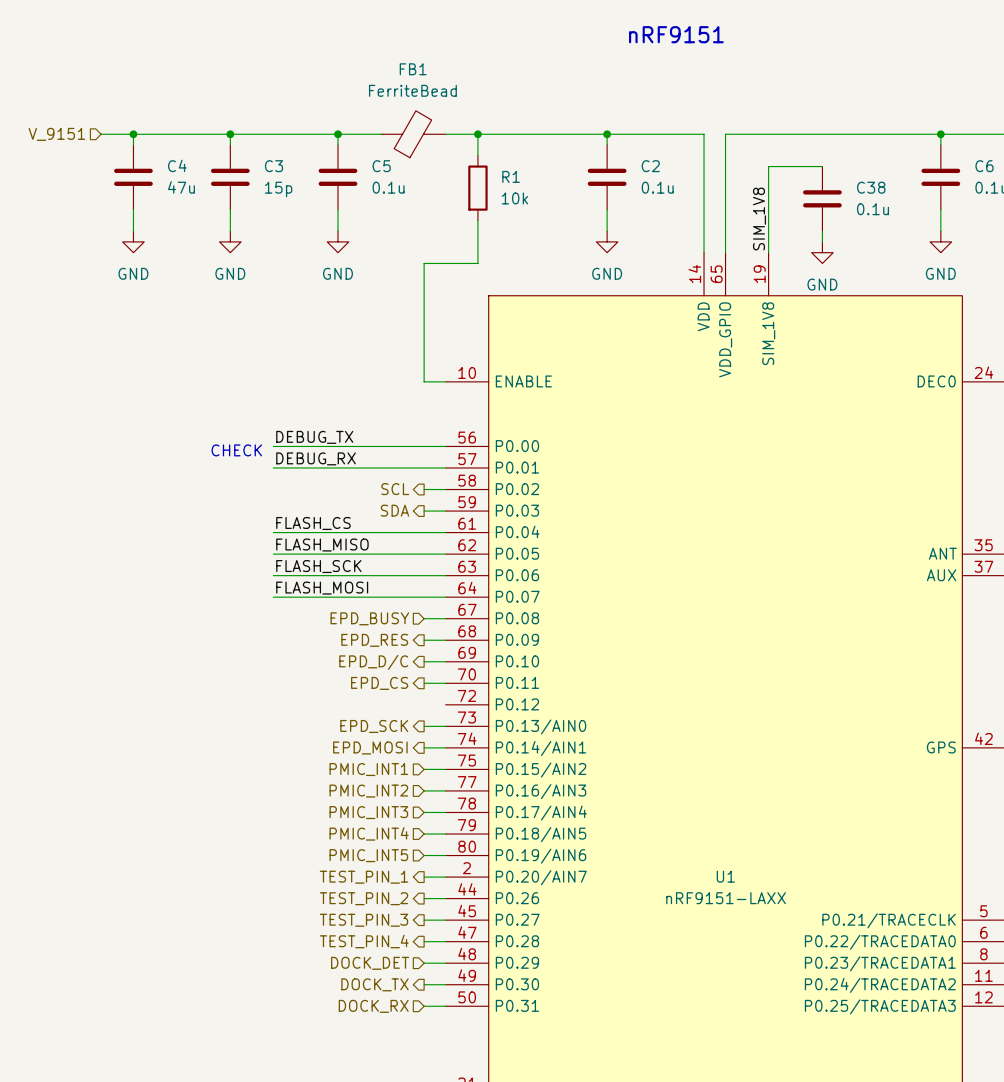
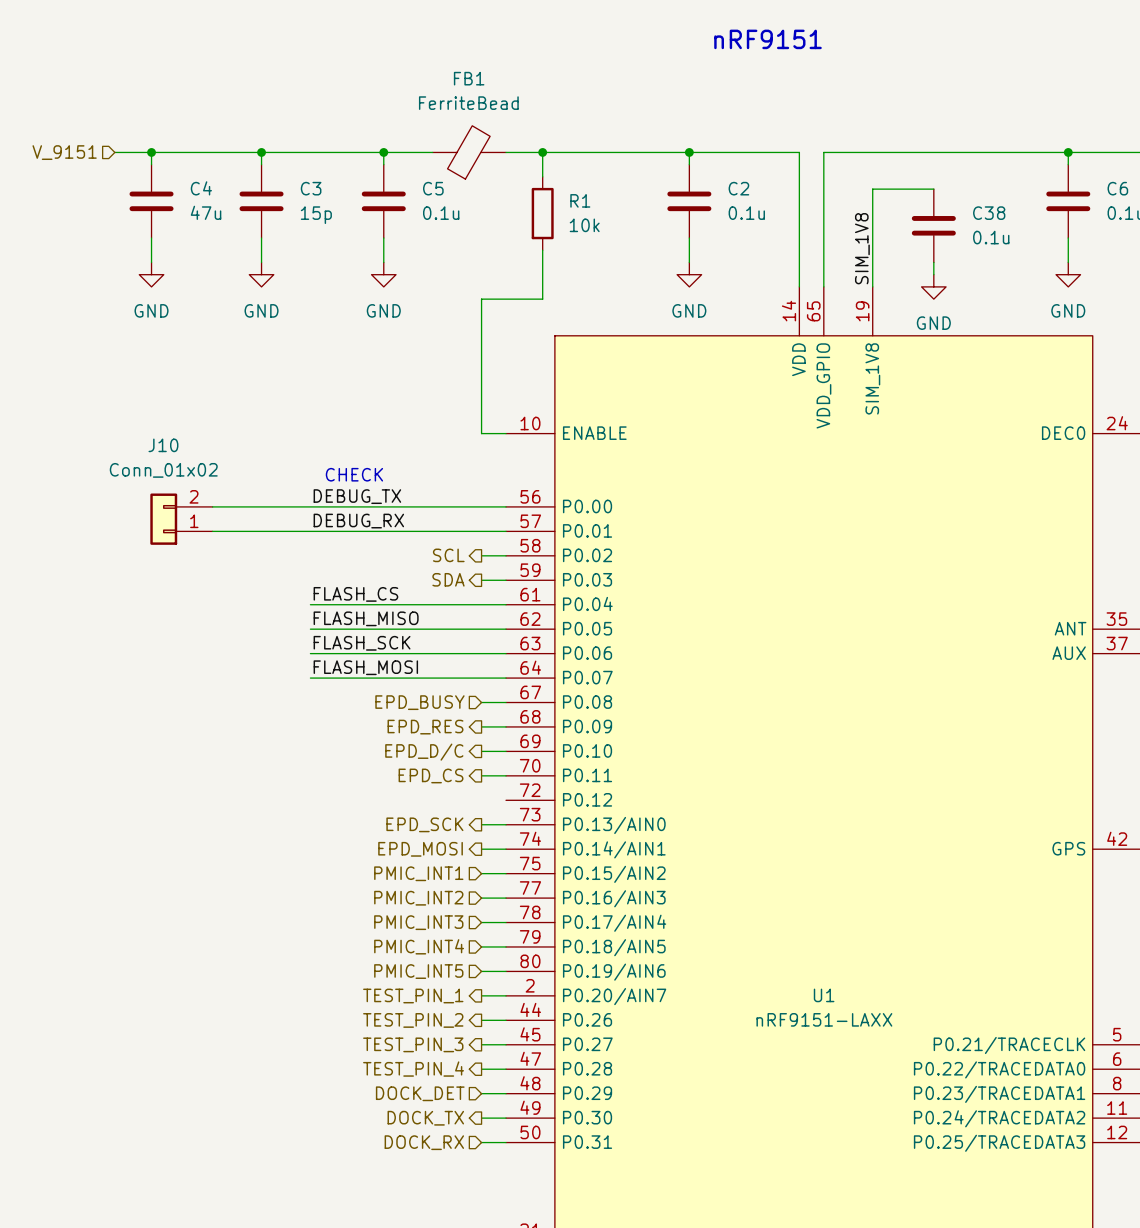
wire: none -> (212, 506) (310, 506)
text position: CHECK (236, 450) -> CHECK (354, 474)
J10: none -> Conn_01x02 (181, 519)
wire: none -> (212, 531) (310, 531)

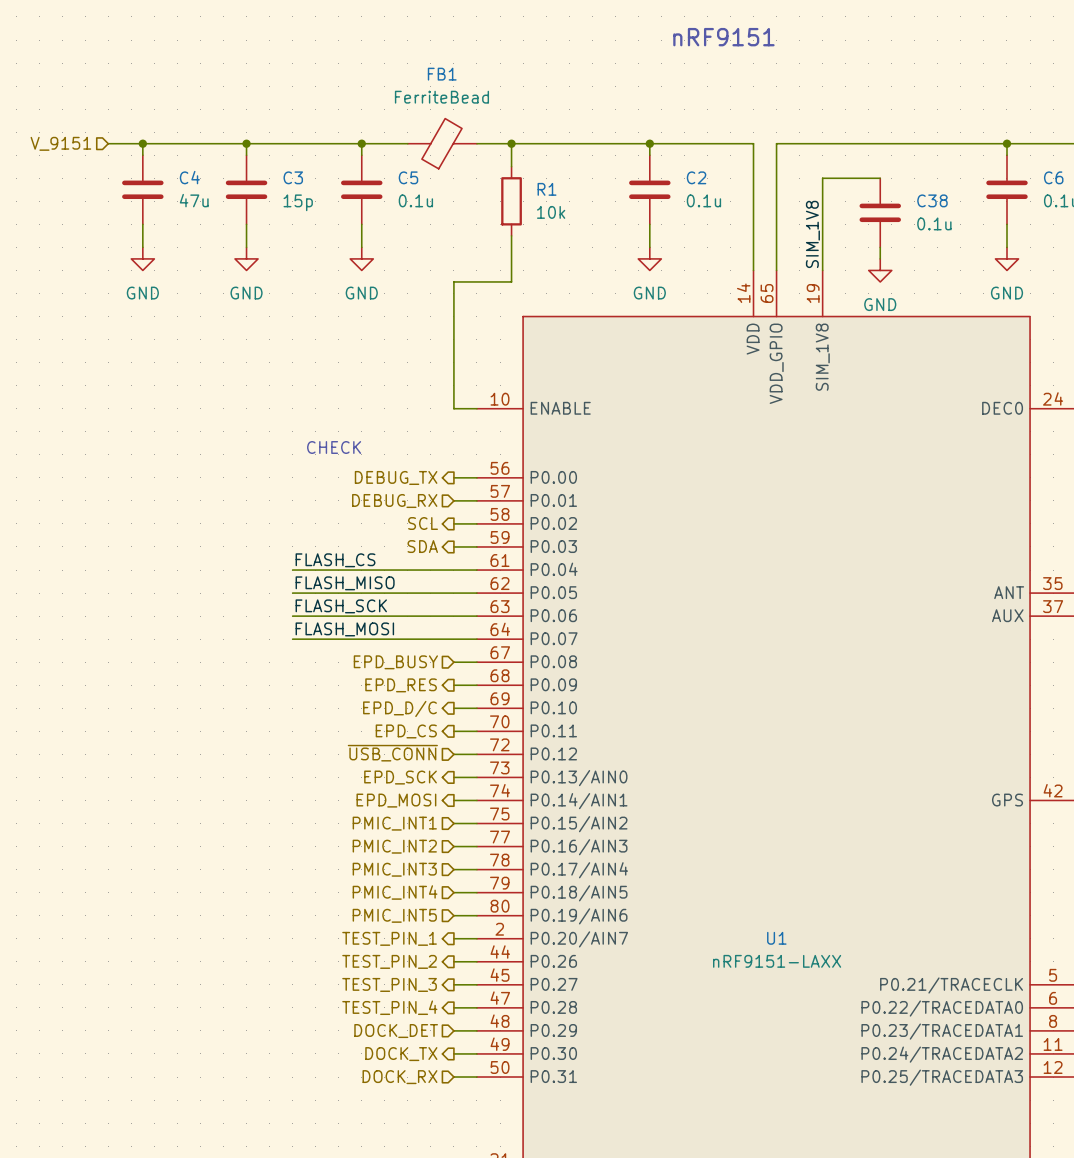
label: DEBUG_TX (357, 496) -> none
wire: (212, 506) (481, 506) -> none
hierarchical label: none -> DEBUG_TX (396, 477)
J10: Conn_01x02 (181, 519) -> none
label: DEBUG_RX (358, 521) -> none
wire: (212, 531) (481, 531) -> none
hierarchical label: none -> DEBUG_RX (394, 501)
hierarchical label: none -> ~{USB_CONN} (392, 753)
wire: none -> (453, 754) (476, 754)

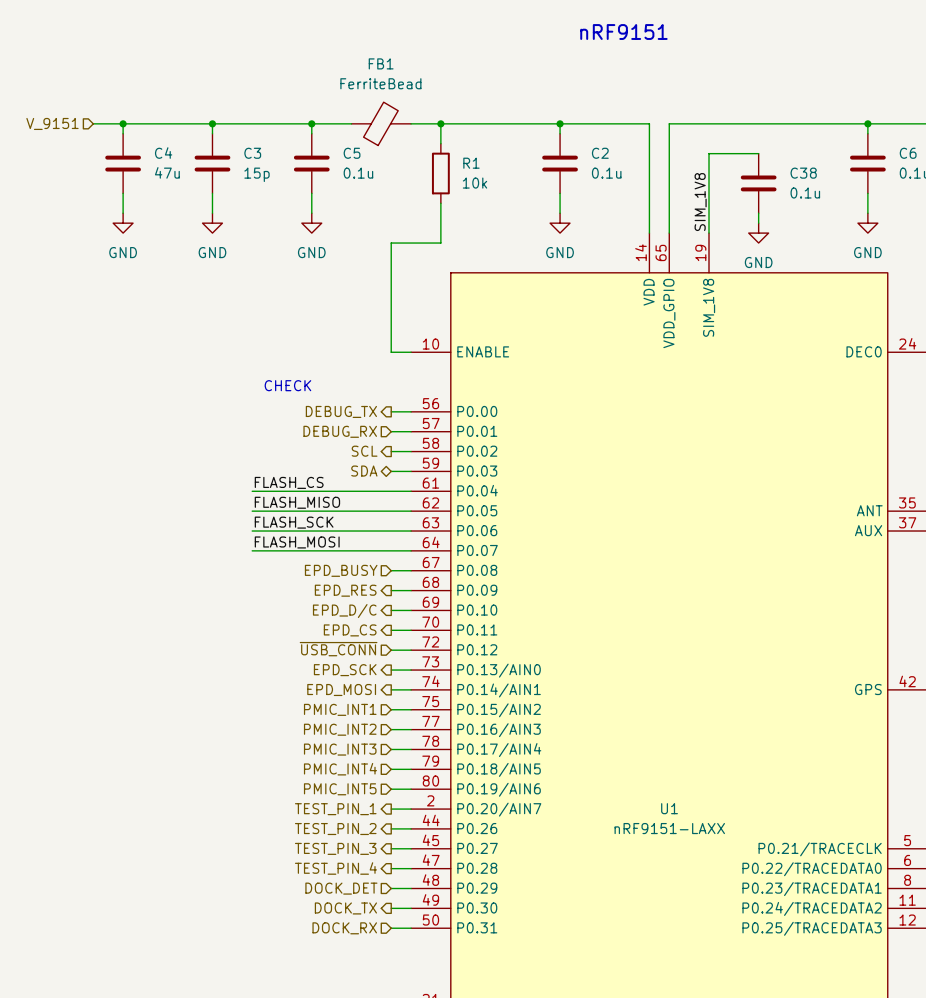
hierarchical label shape: output (422, 546) -> bidirectional (364, 471)

